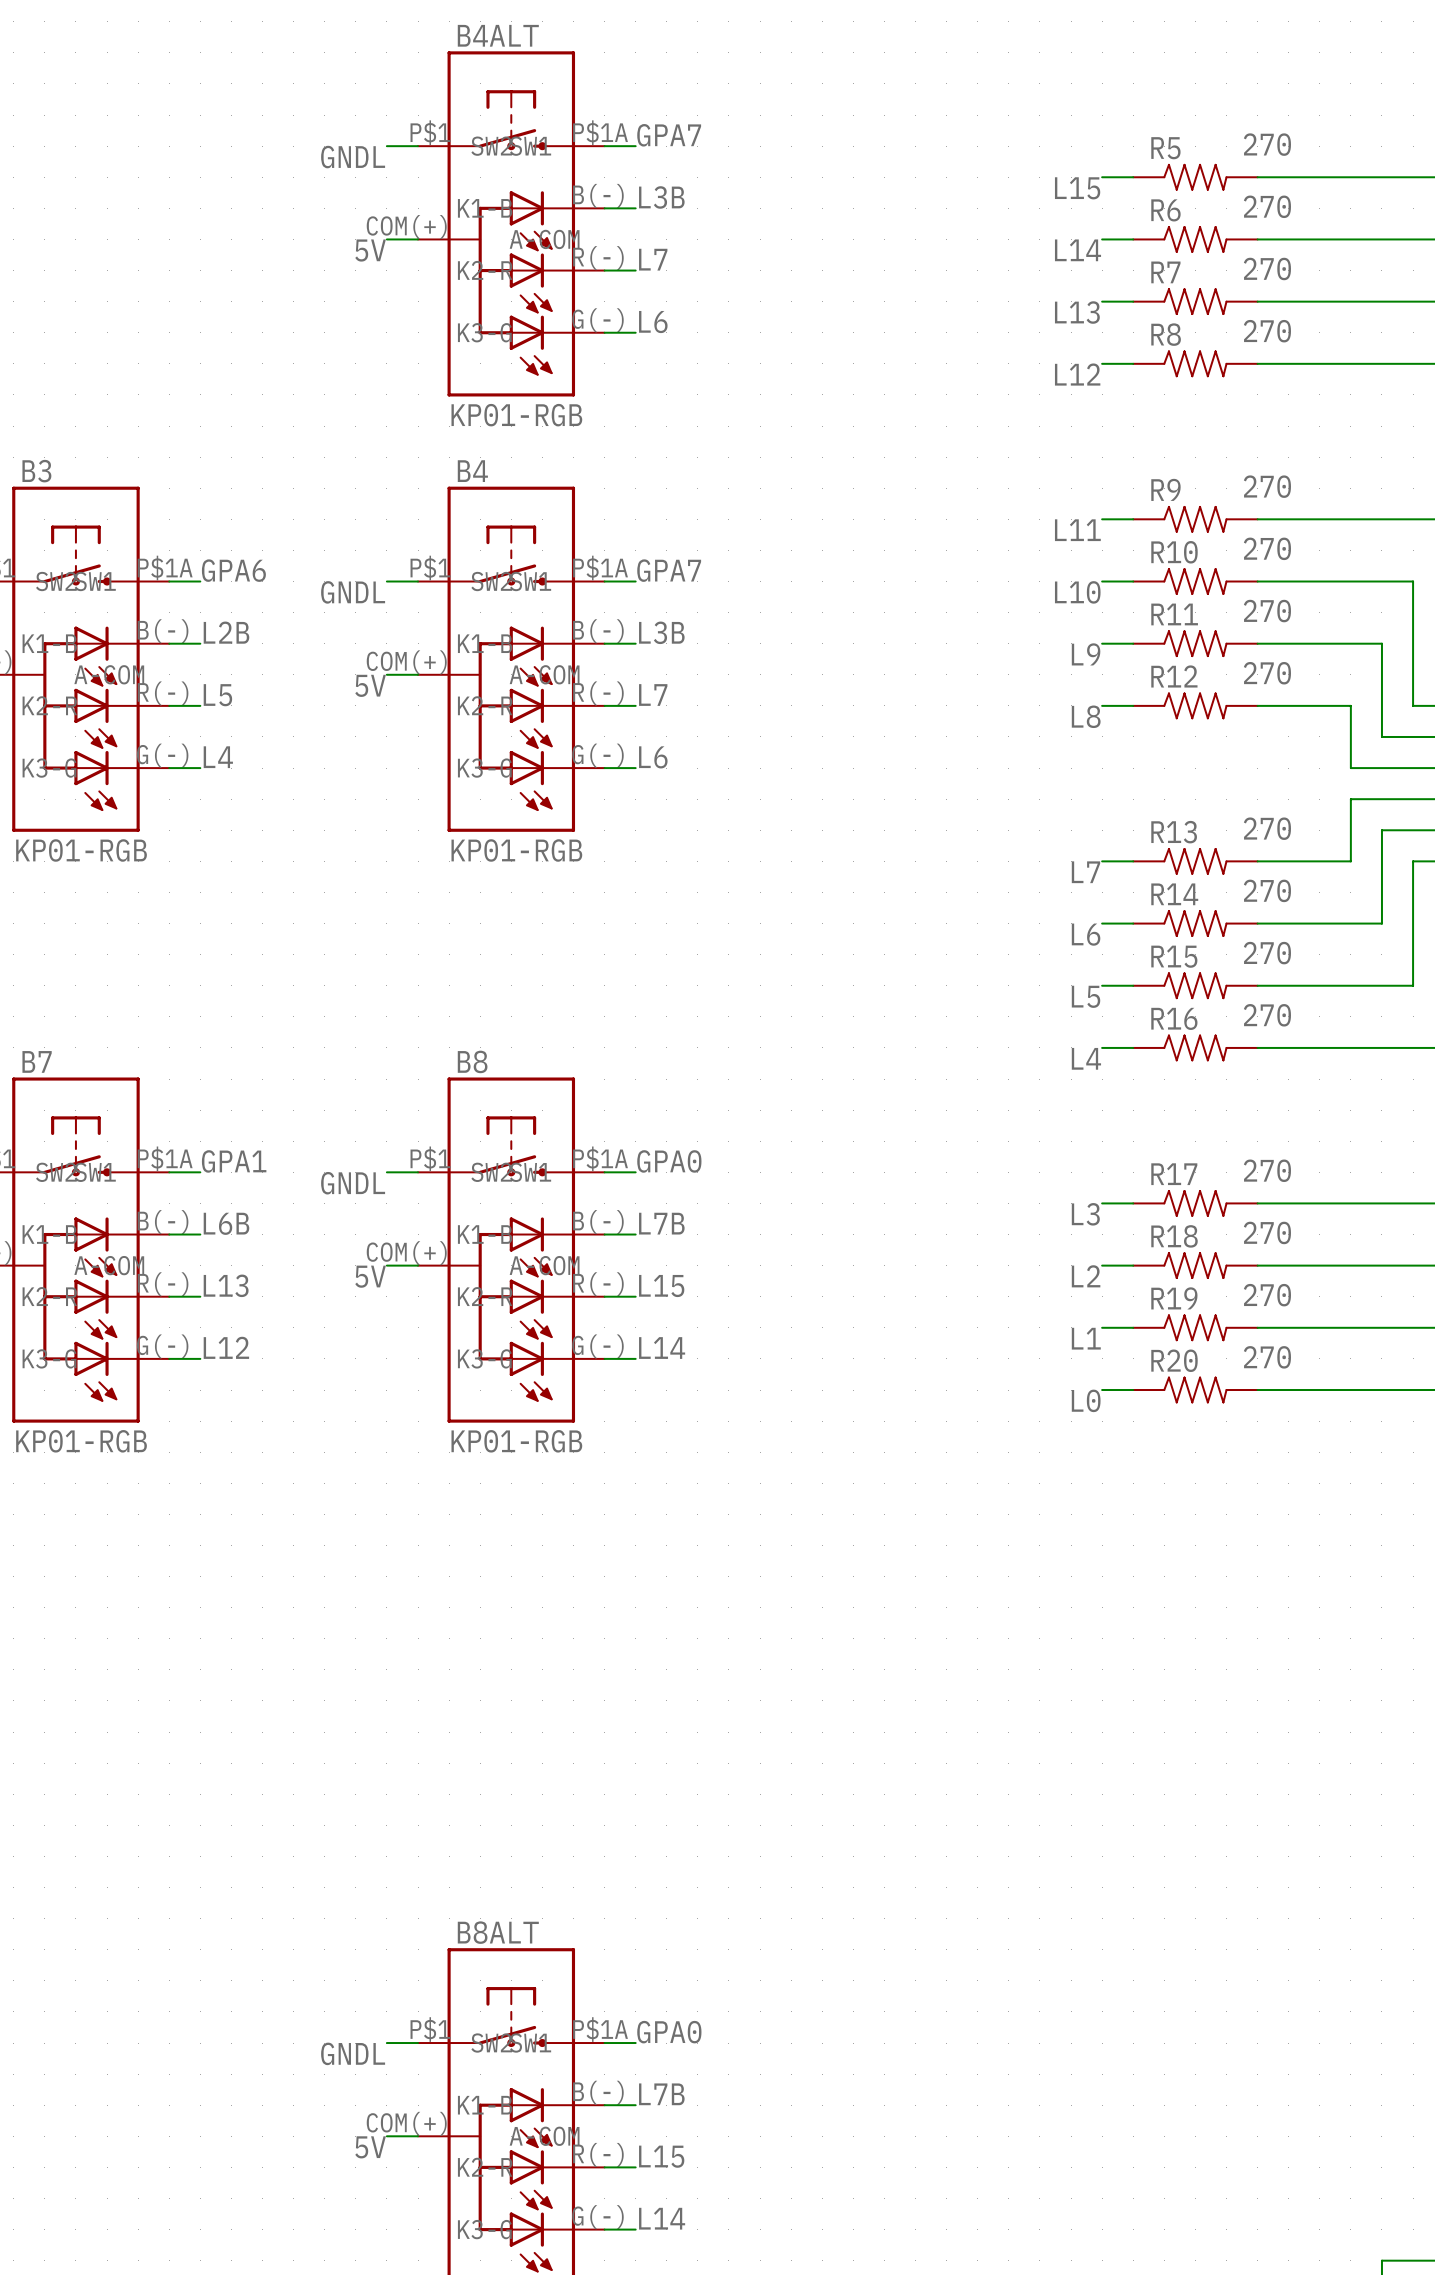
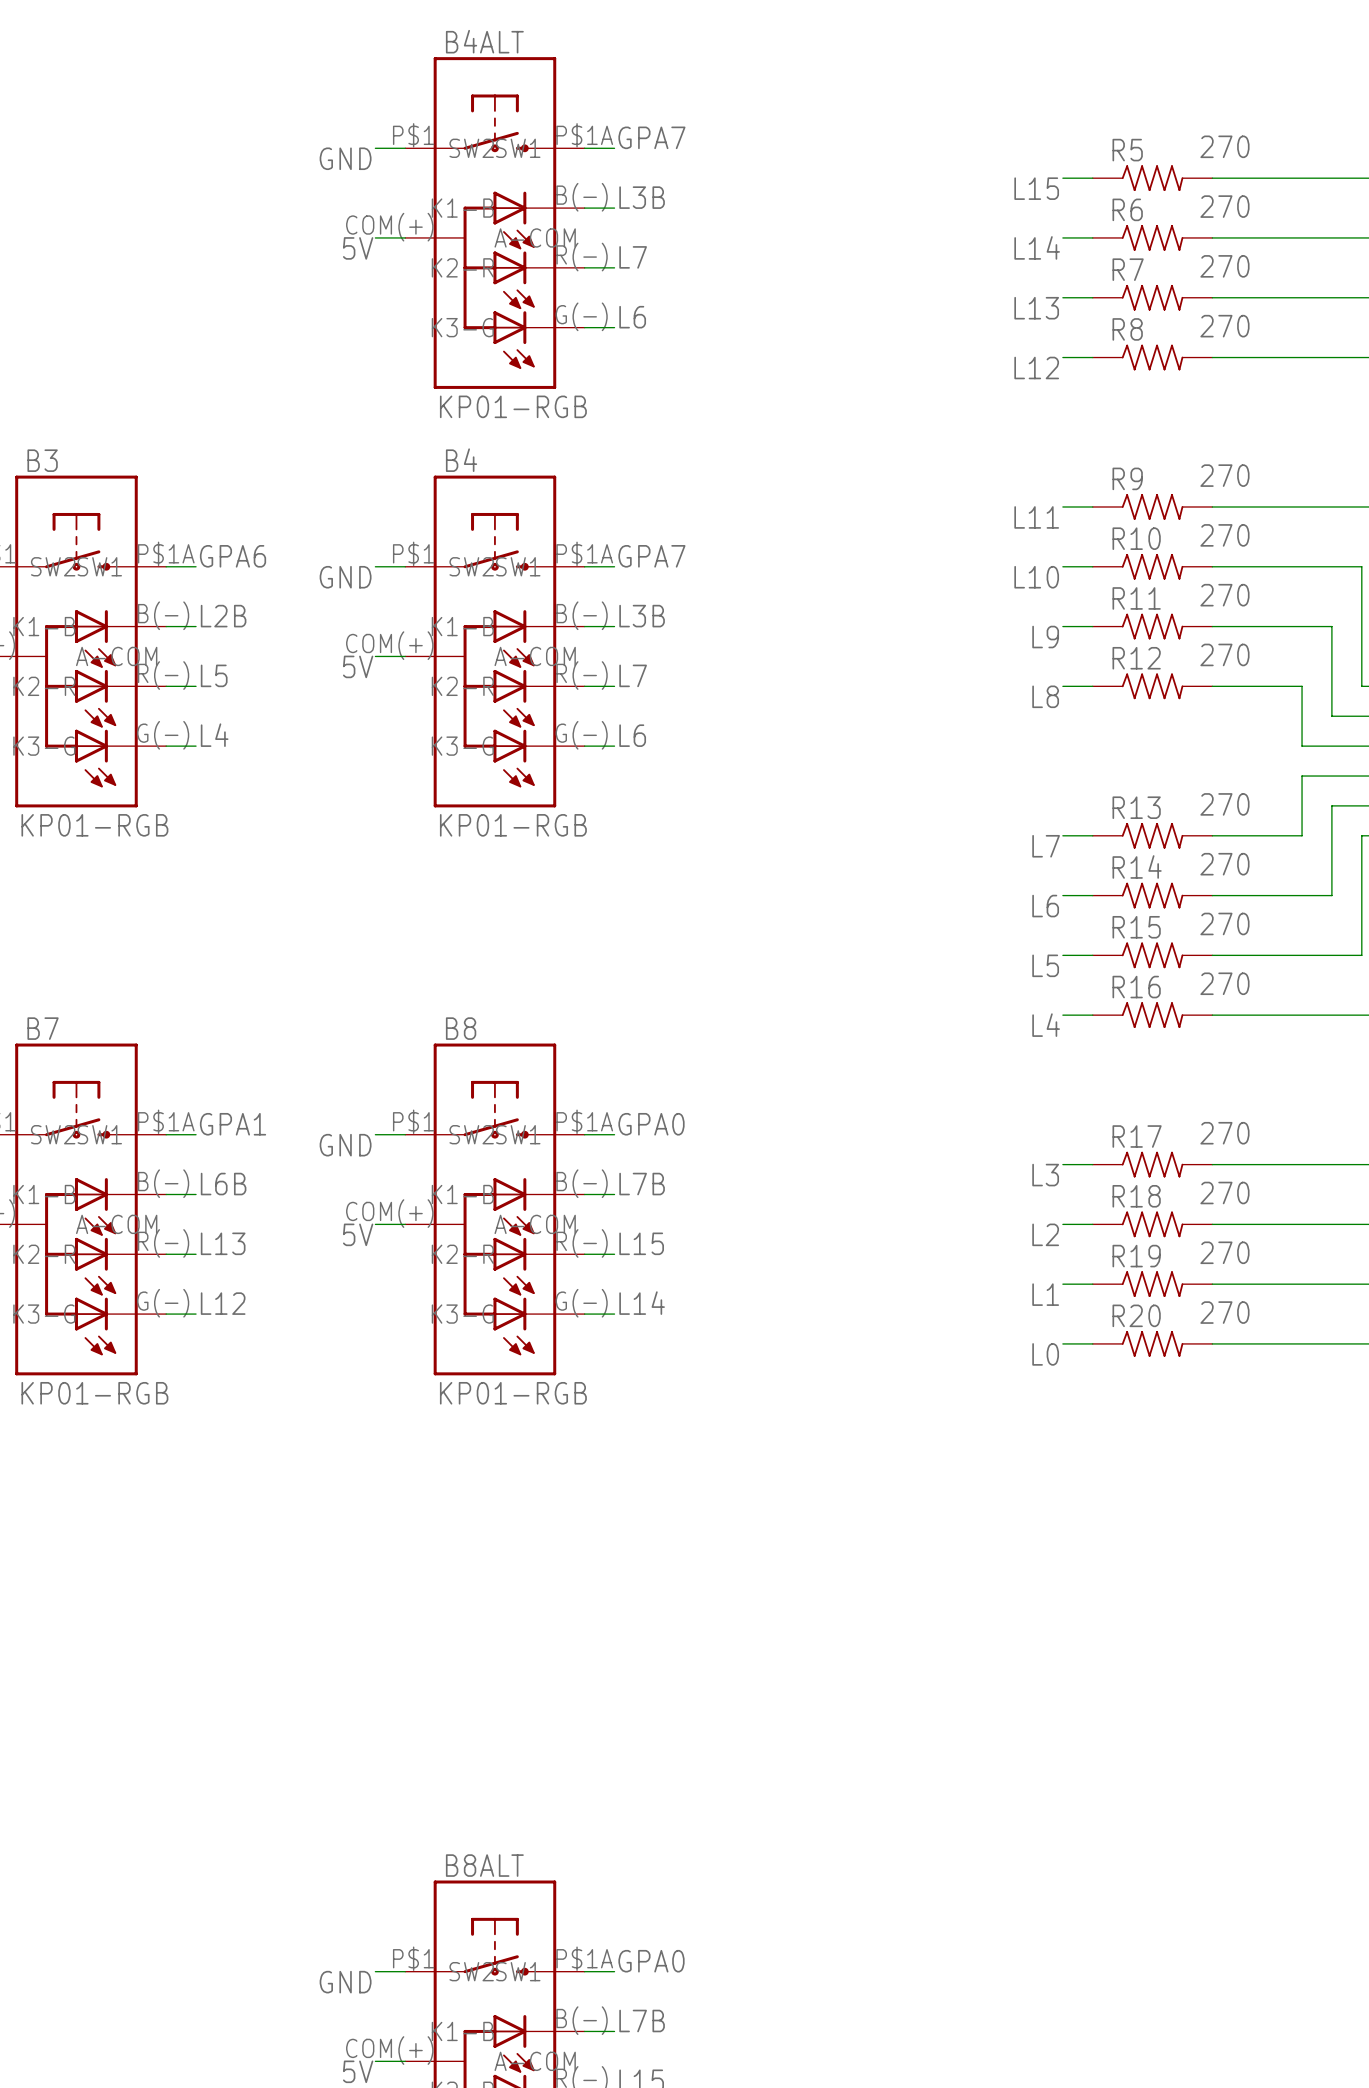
label: GNDL (353, 157) -> GND (345, 158)
label: GNDL (353, 592) -> GND (345, 577)
label: GNDL (353, 1183) -> GND (345, 1145)
label: GNDL (353, 2053) -> GND (345, 1982)

